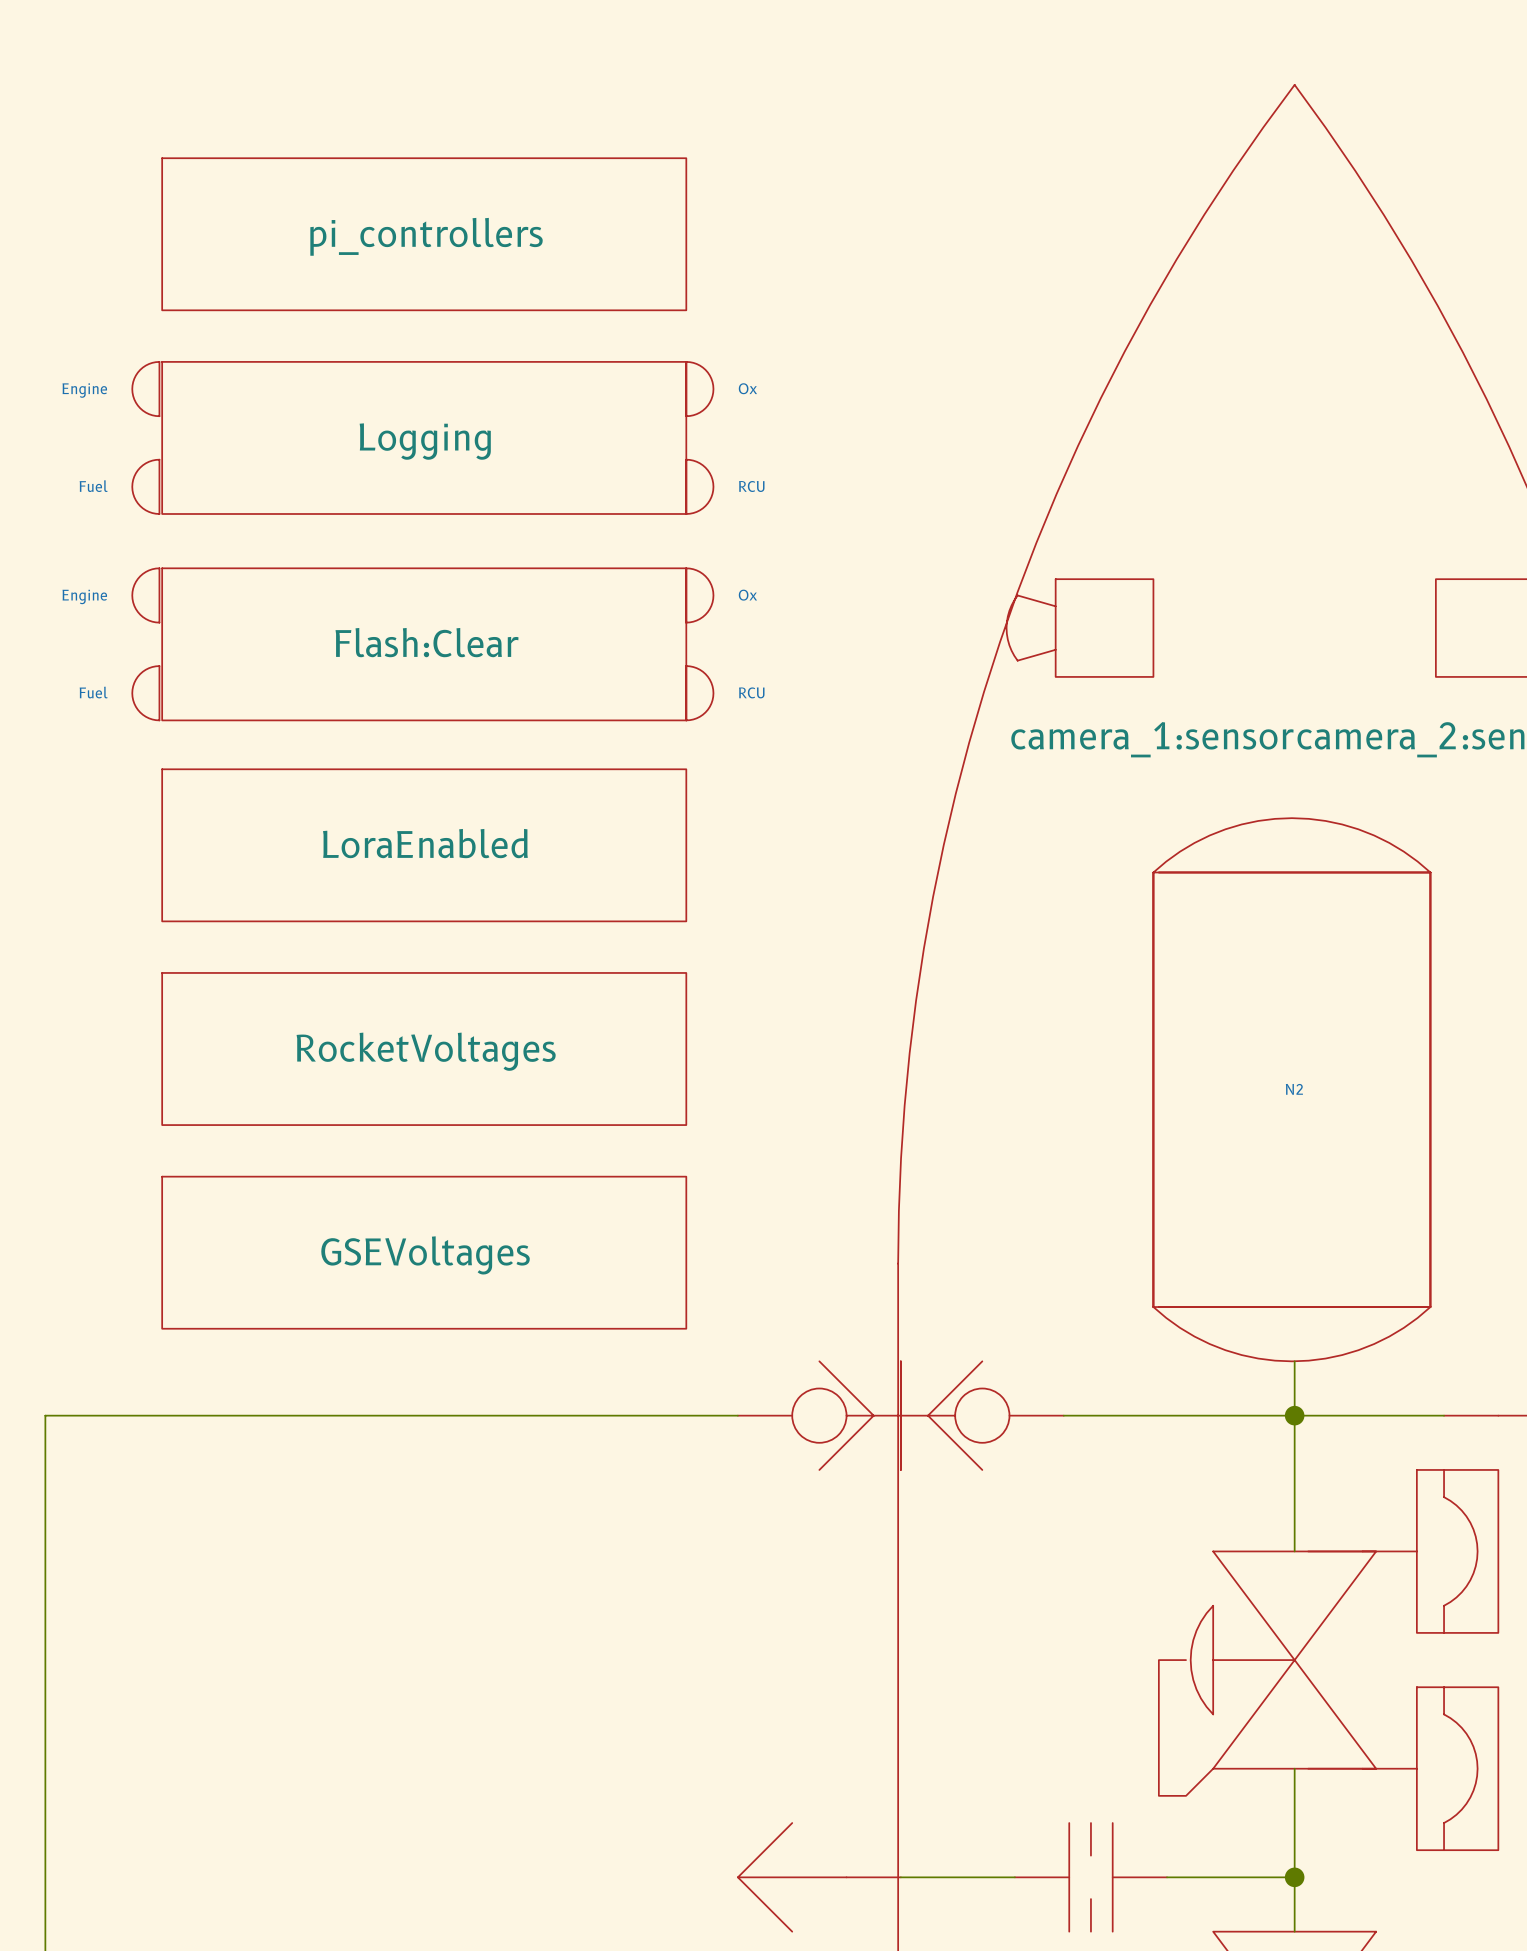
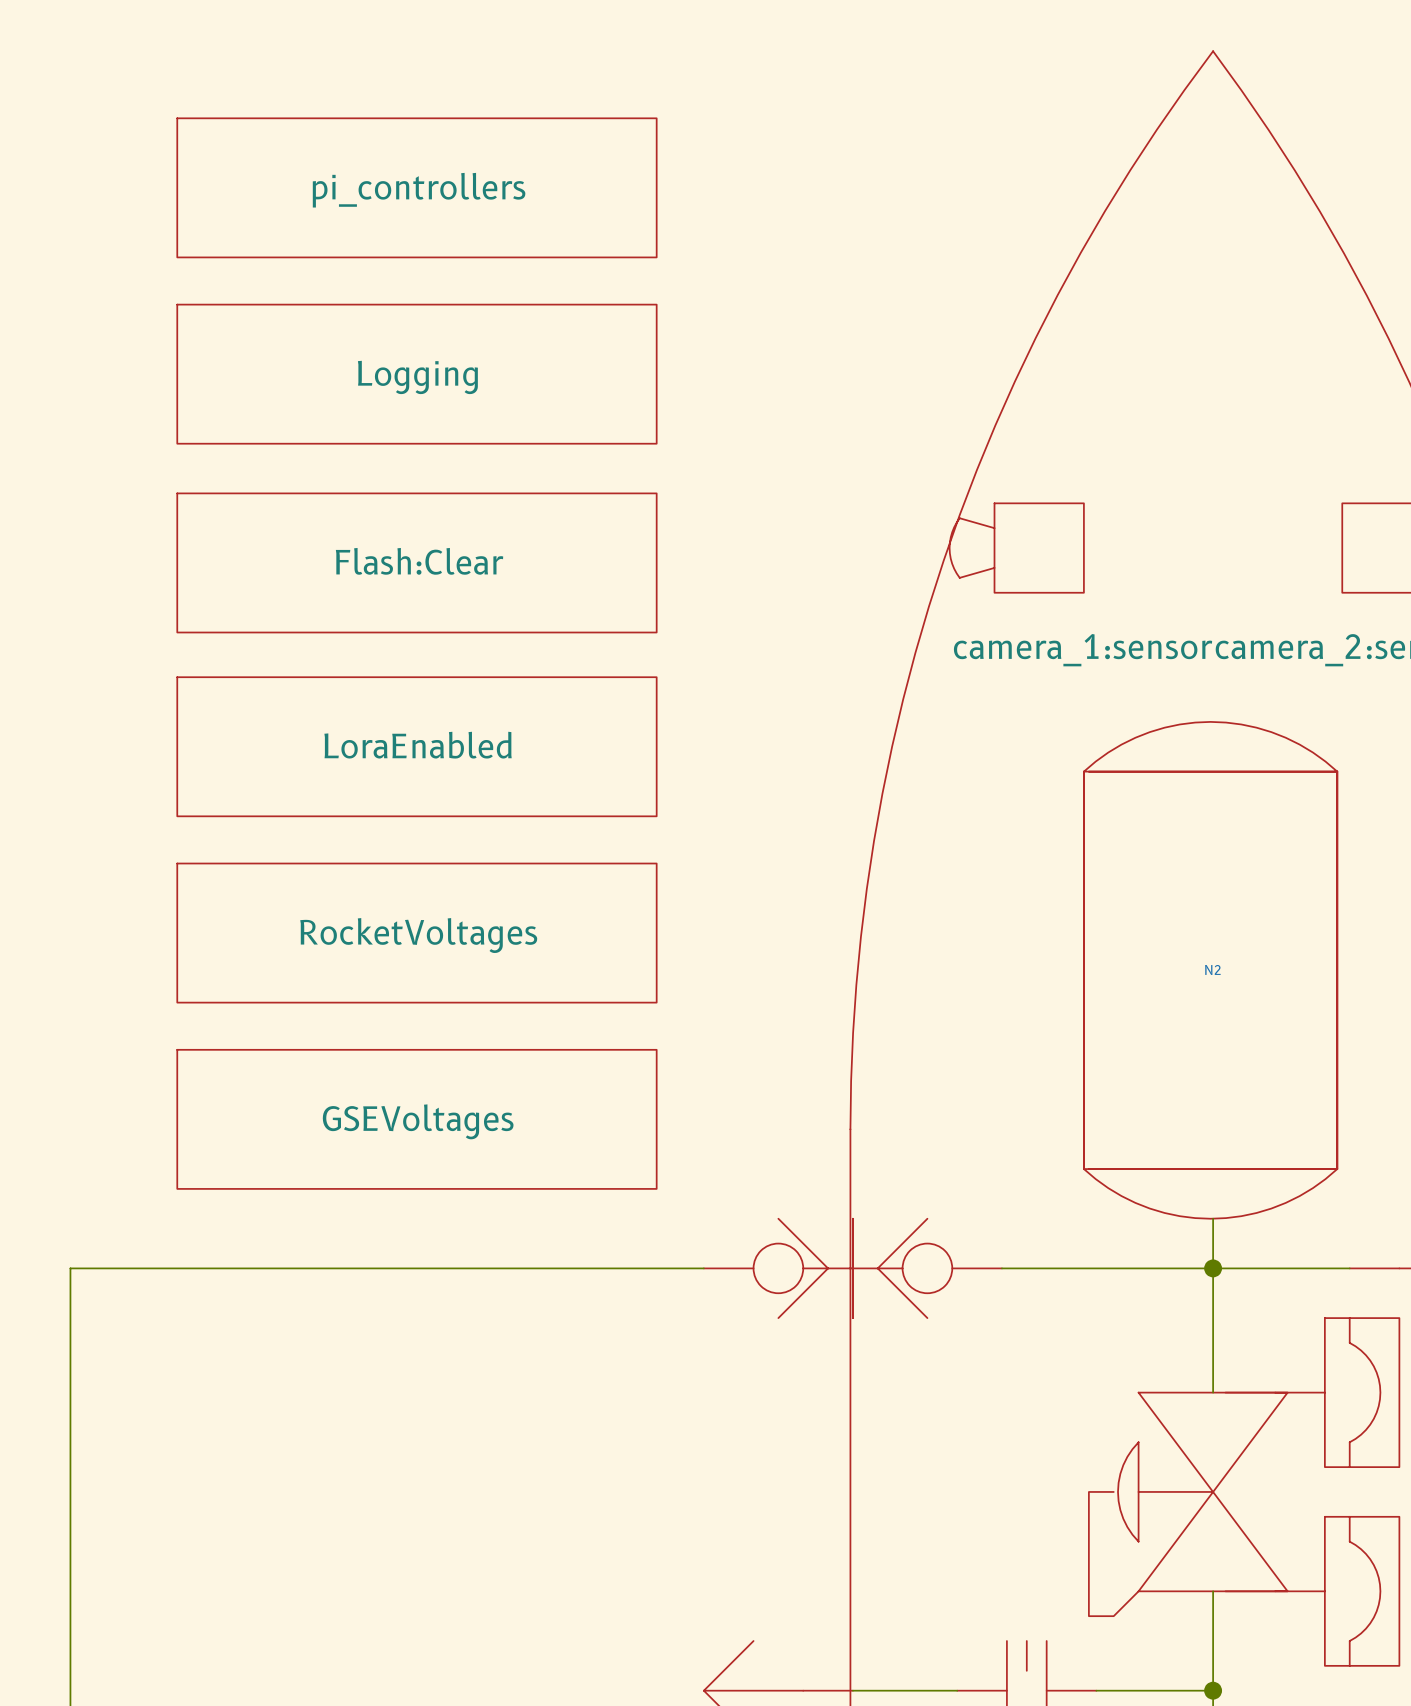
Engine: (145, 389) -> none
Ox: (699, 389) -> none
Fuel: (145, 486) -> none
RCU: (699, 486) -> none
Engine: (145, 595) -> none
Ox: (699, 595) -> none
Fuel: (145, 693) -> none
RCU: (699, 693) -> none

